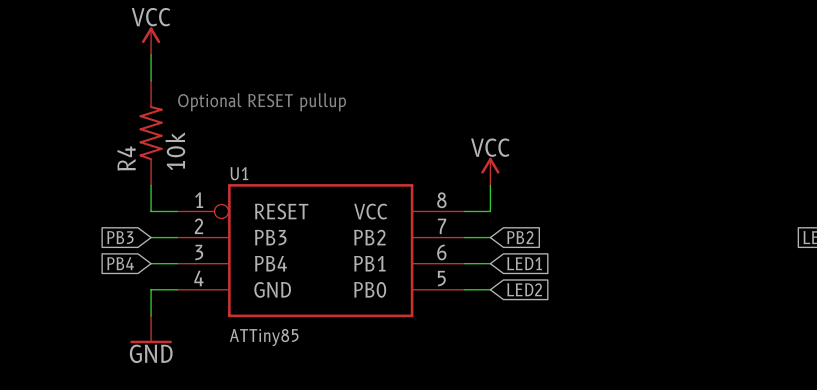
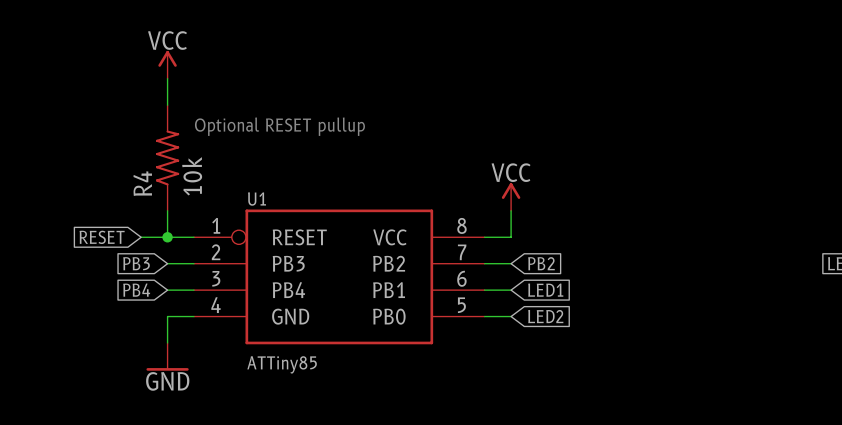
global label: none -> RESET (102, 237)
wire: none -> (141, 237) (167, 237)
junction: none -> (167, 237)

